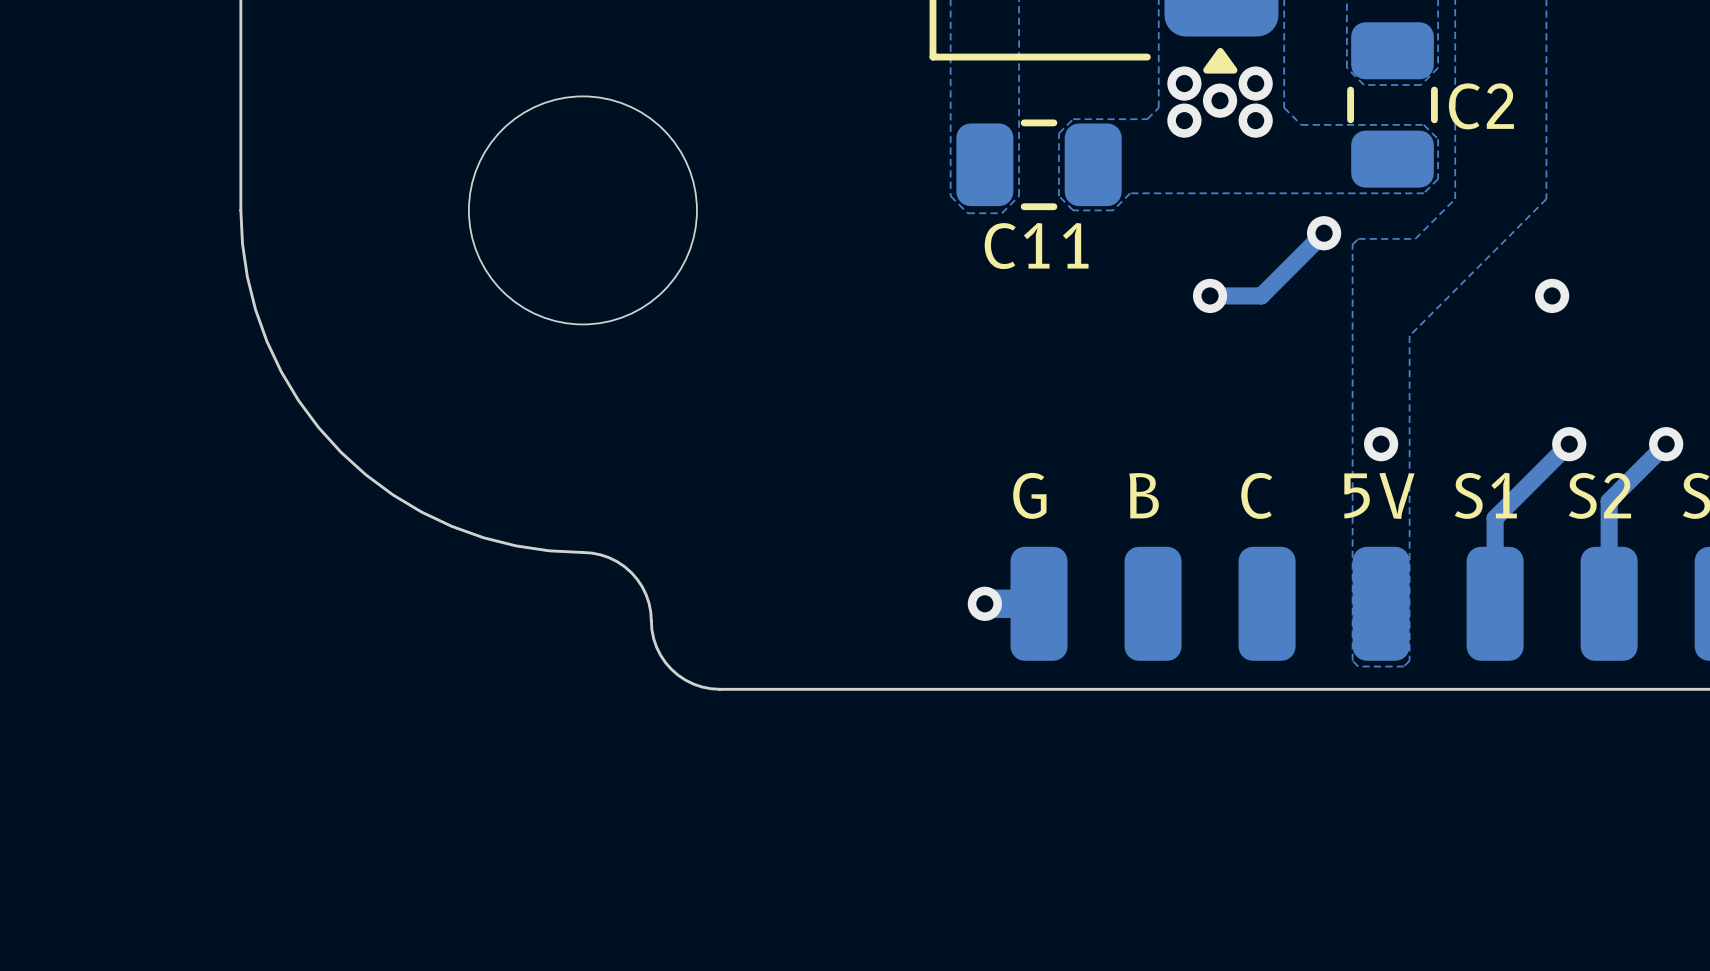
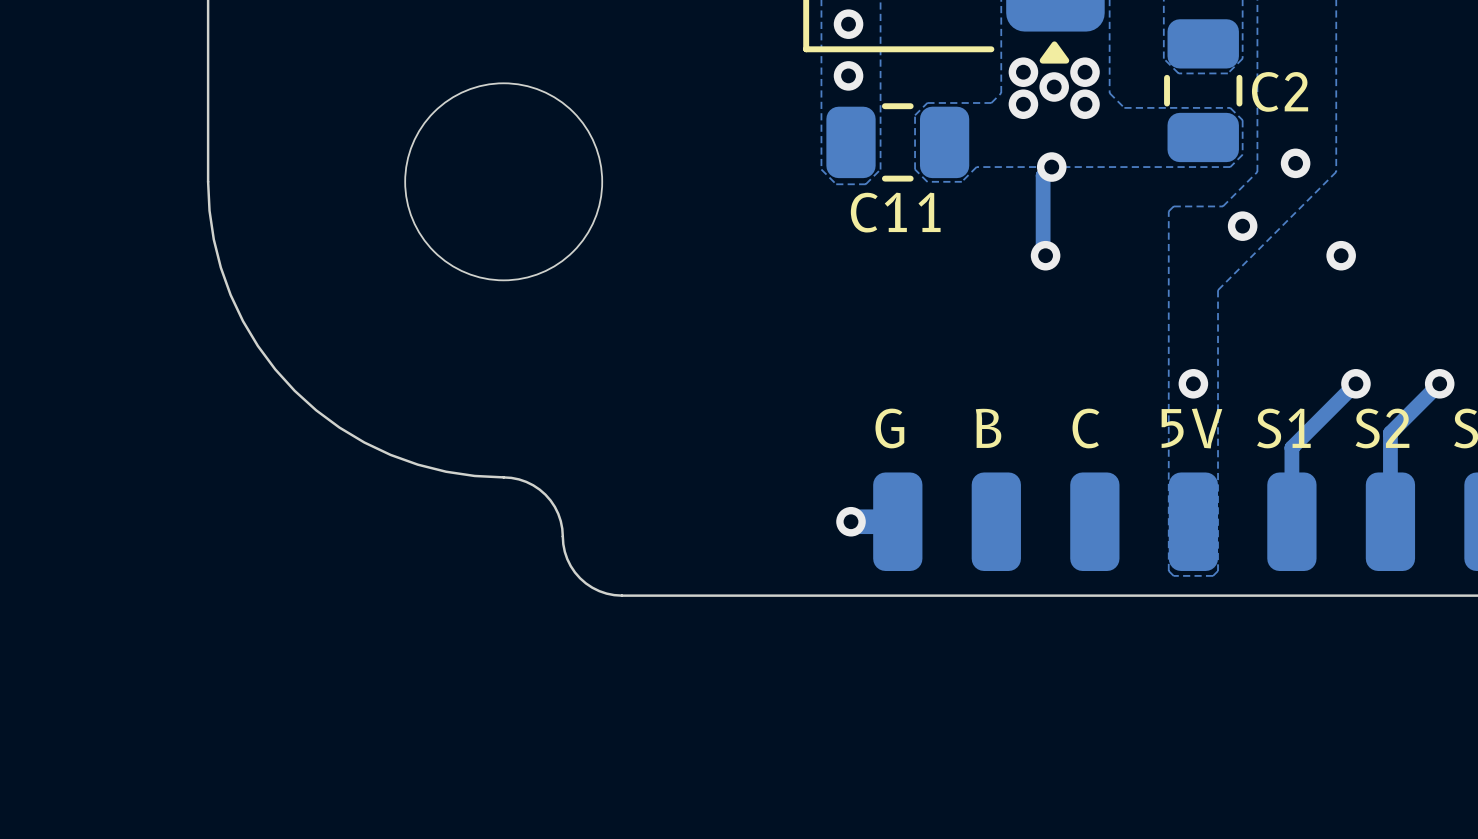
via: none -> (848, 24)
via: none -> (848, 75)
via: none -> (1295, 163)
track: none -> (1051, 167) (1043, 175) (1043, 254)
via: none -> (1051, 167)
track: (1324, 233) (1261, 295) (1210, 295) -> none
via: (1324, 233) -> none
via: none -> (1242, 226)

